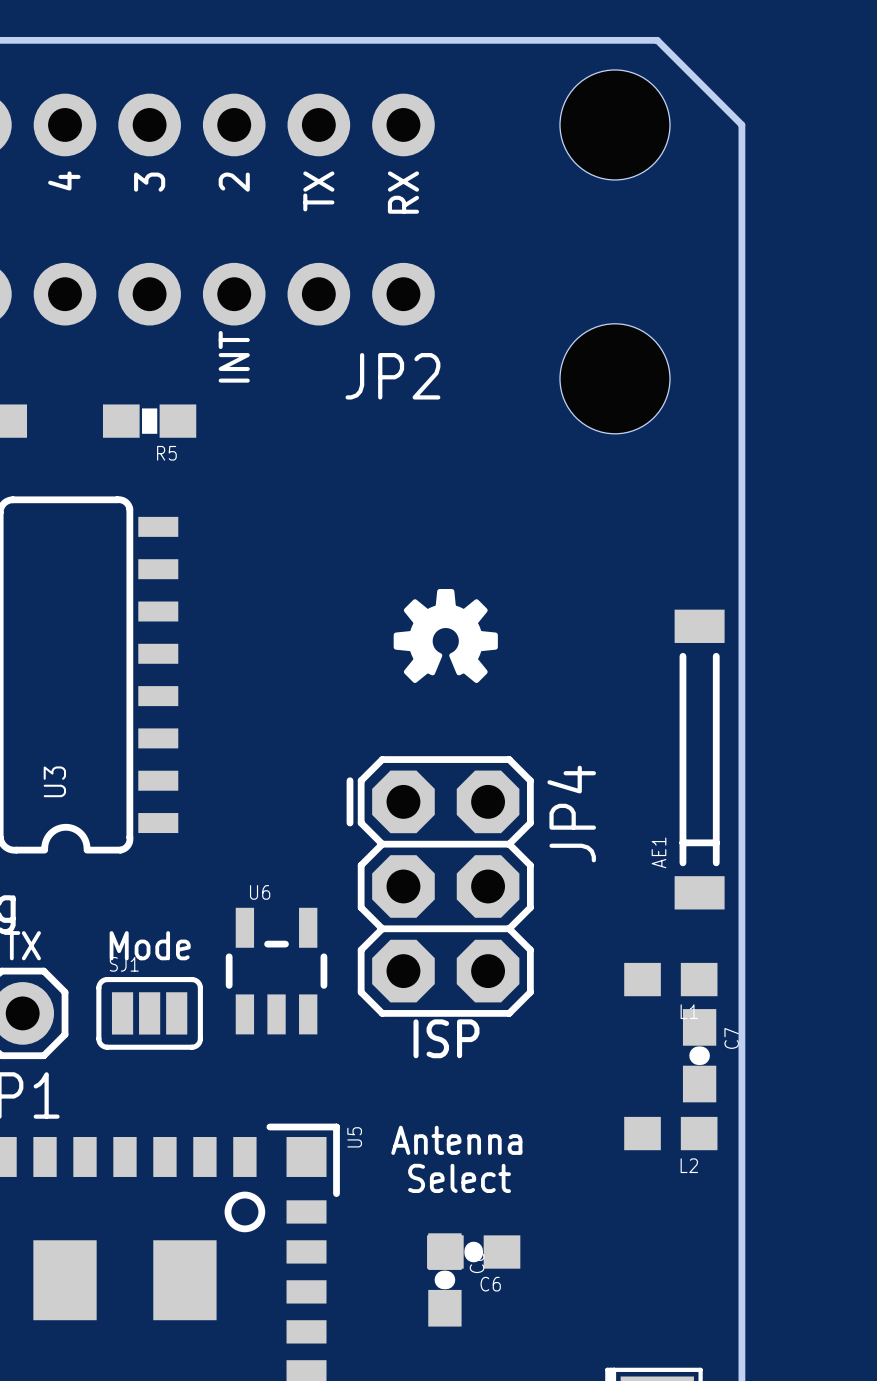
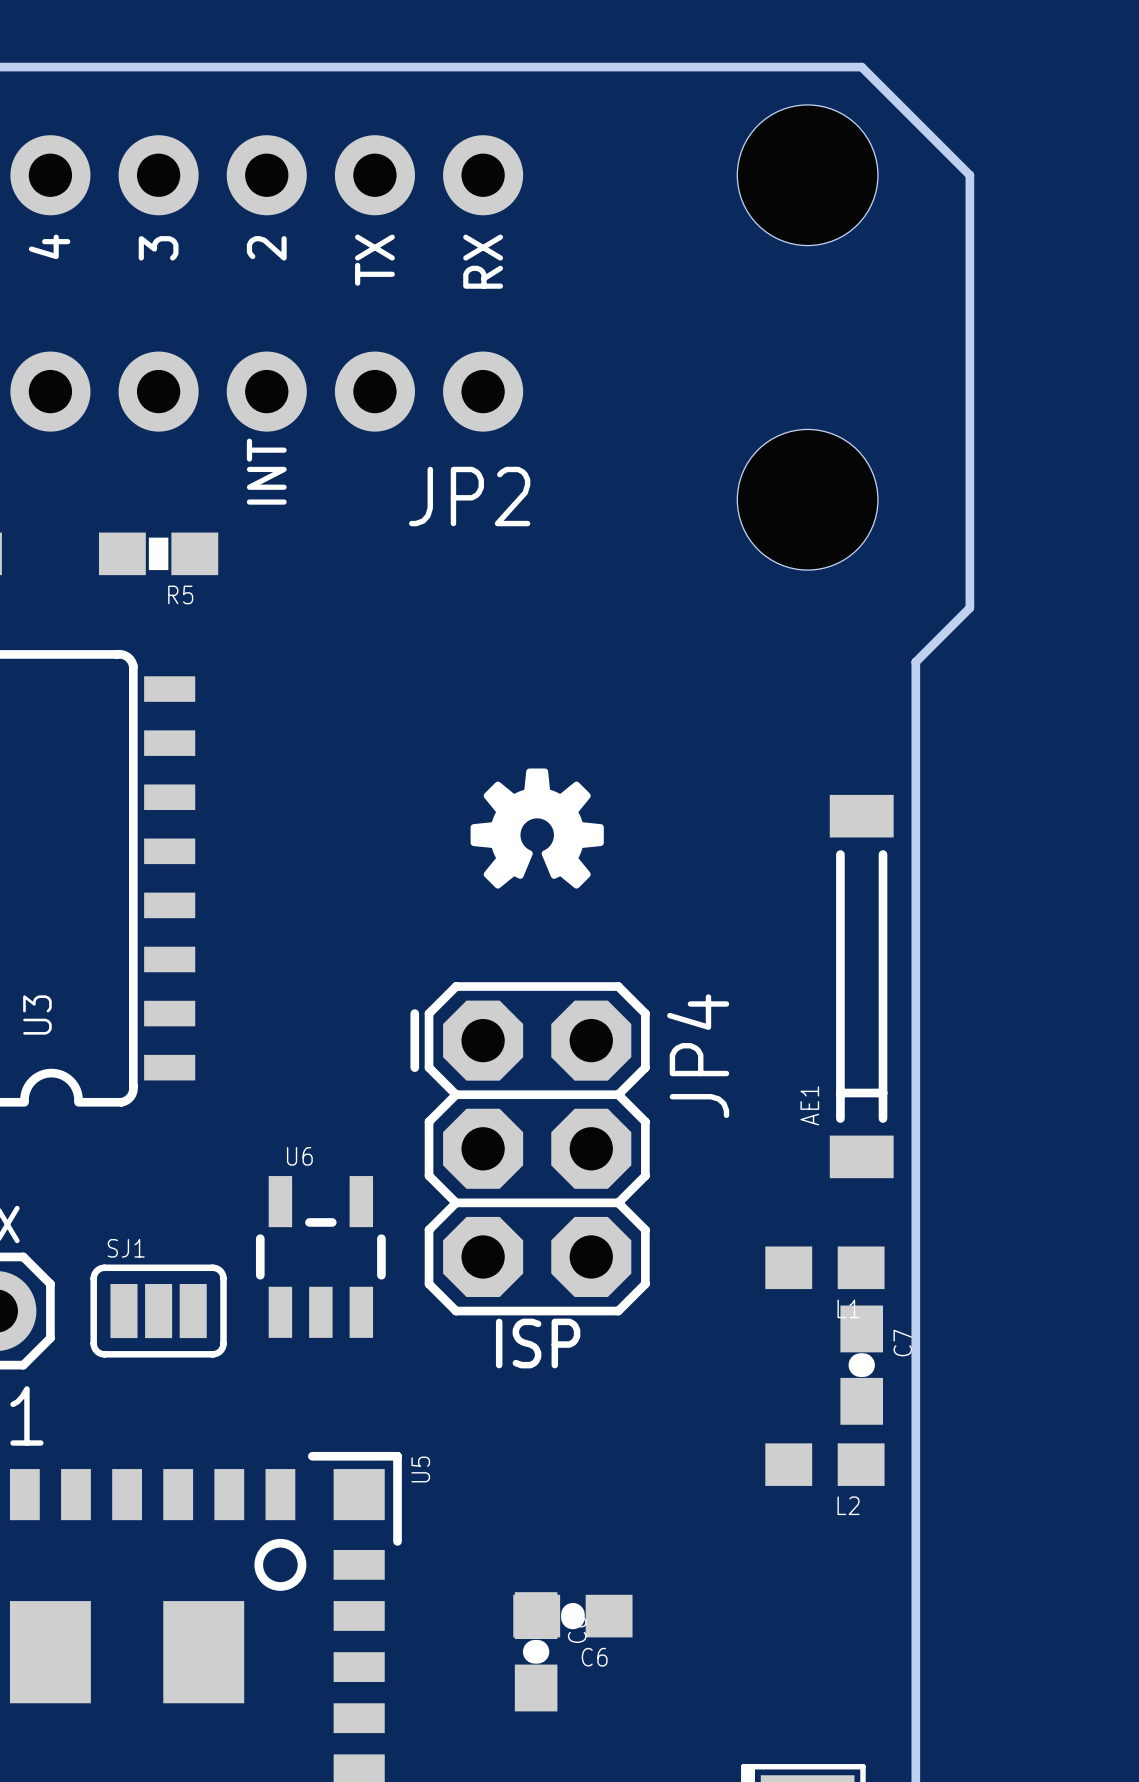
board edge: (657, 40) (741, 124) (741, 505) -> (807, 67) (861, 67) (969, 175) (969, 607) (915, 662)
part position: (614, 124) -> (807, 175)
part position: (614, 378) -> (807, 499)
text: Mode (150, 945) -> none
text: Antenna (456, 1140) -> none
text: Select (459, 1178) -> none

